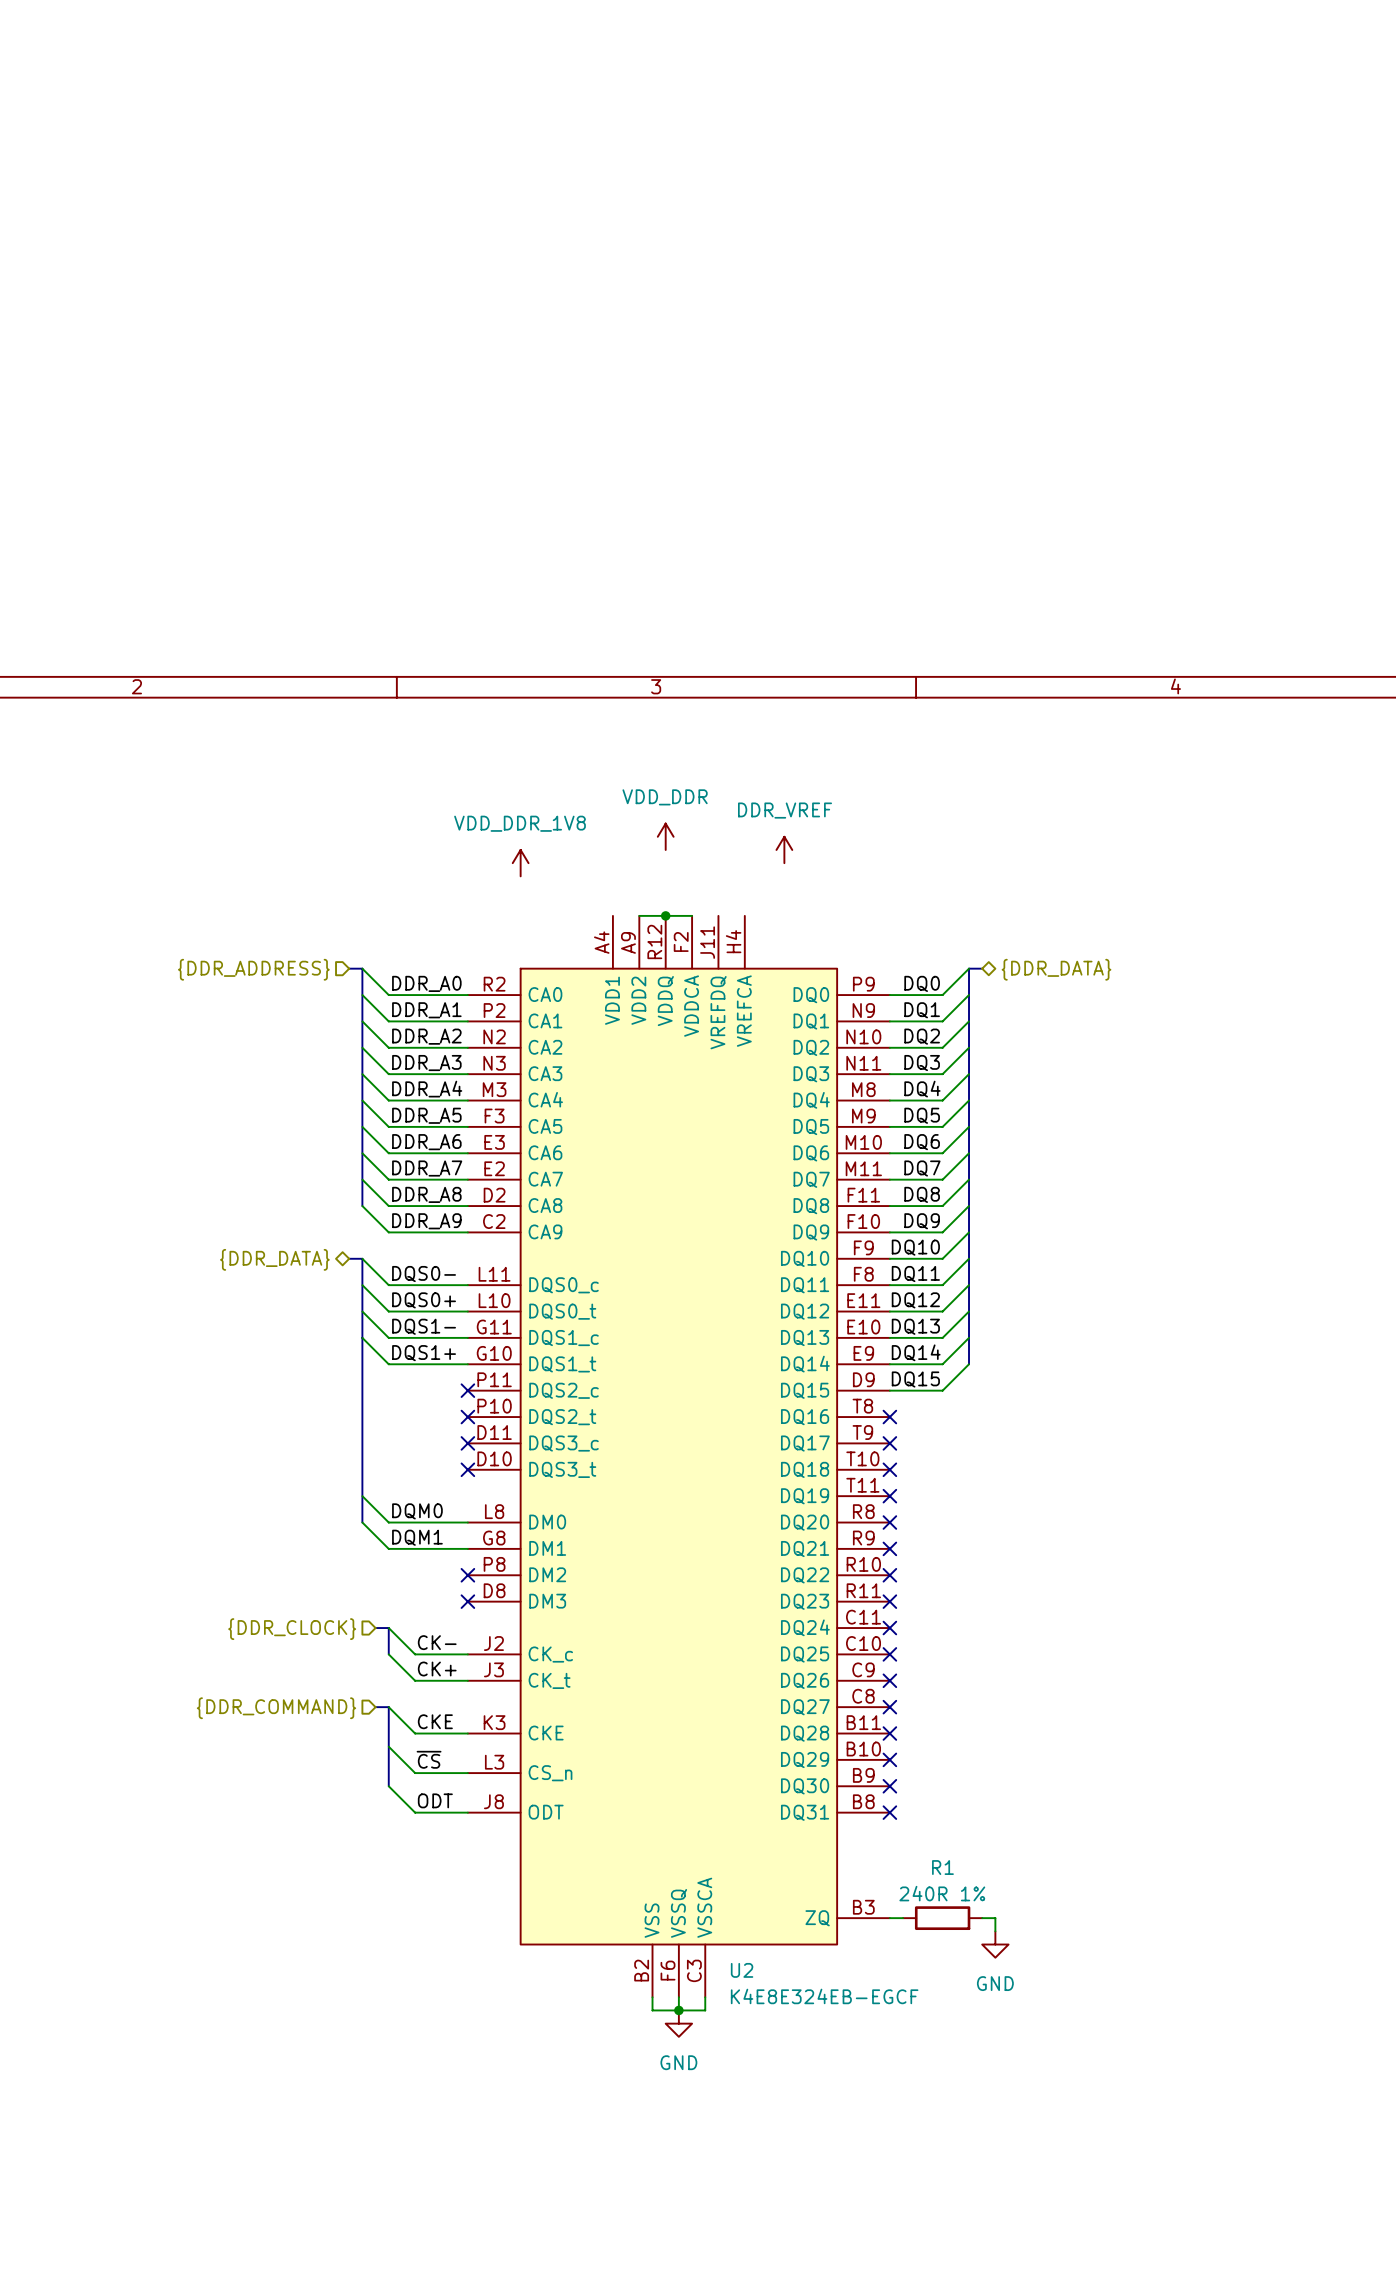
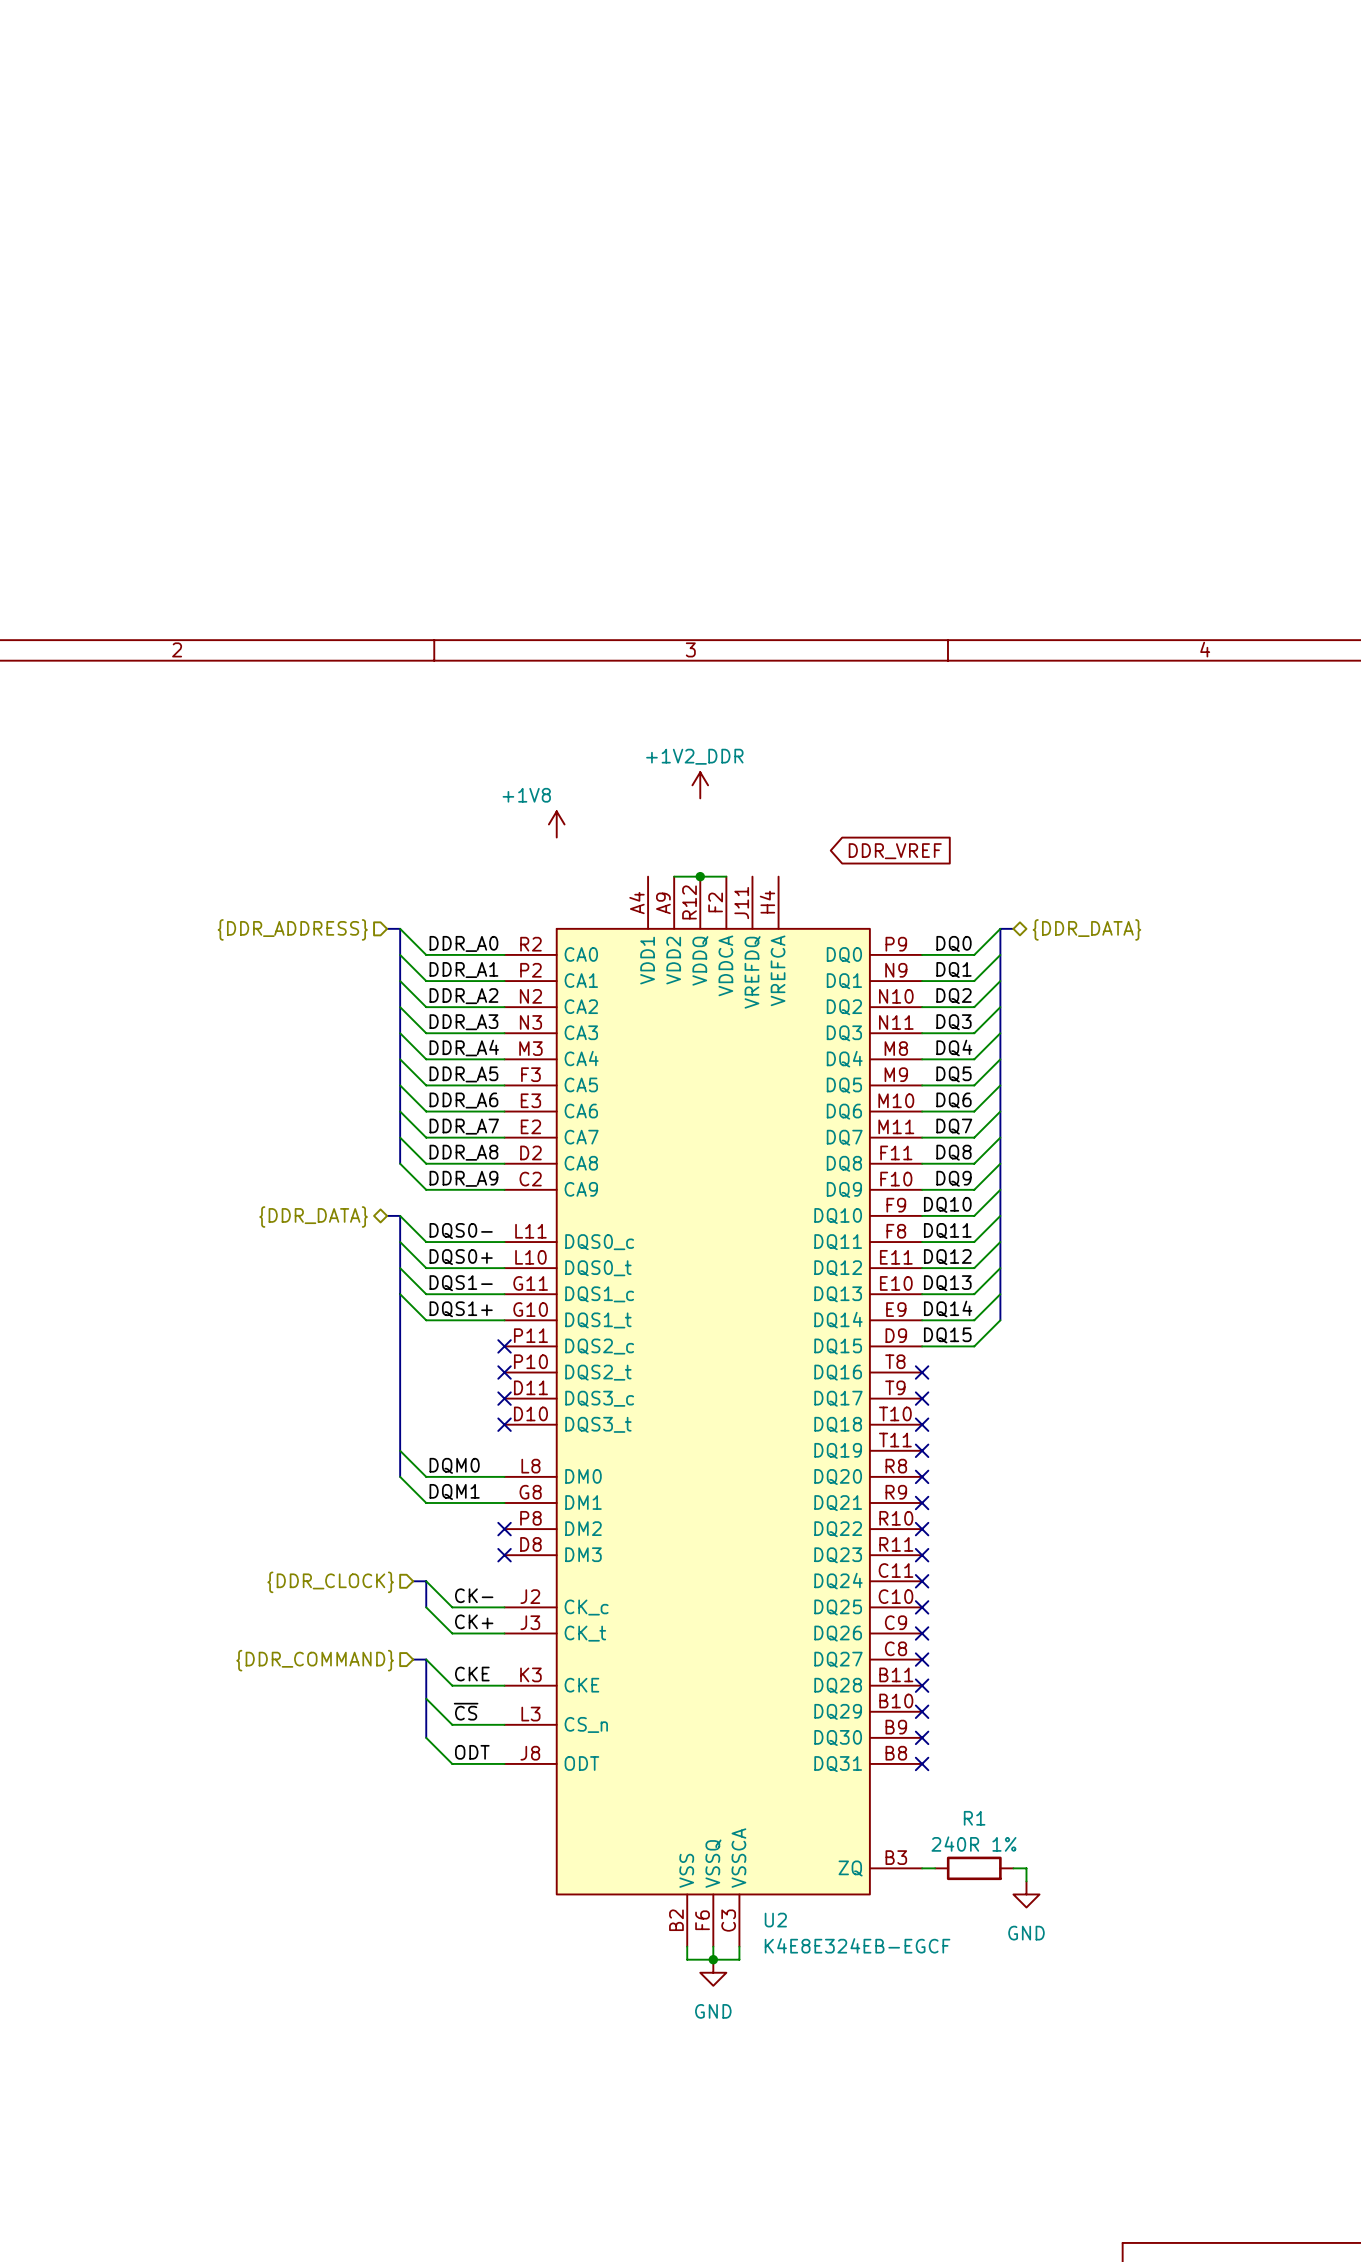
power symbol: none -> +1V2_DDR (700, 785)
power symbol: VDD_DDR (665, 836) -> none
power symbol: DDR_VREF (784, 849) -> none
power symbol: VDD_DDR_1V8 (520, 863) -> +1V8 (556, 824)
global label: none -> DDR_VREF (895, 851)

